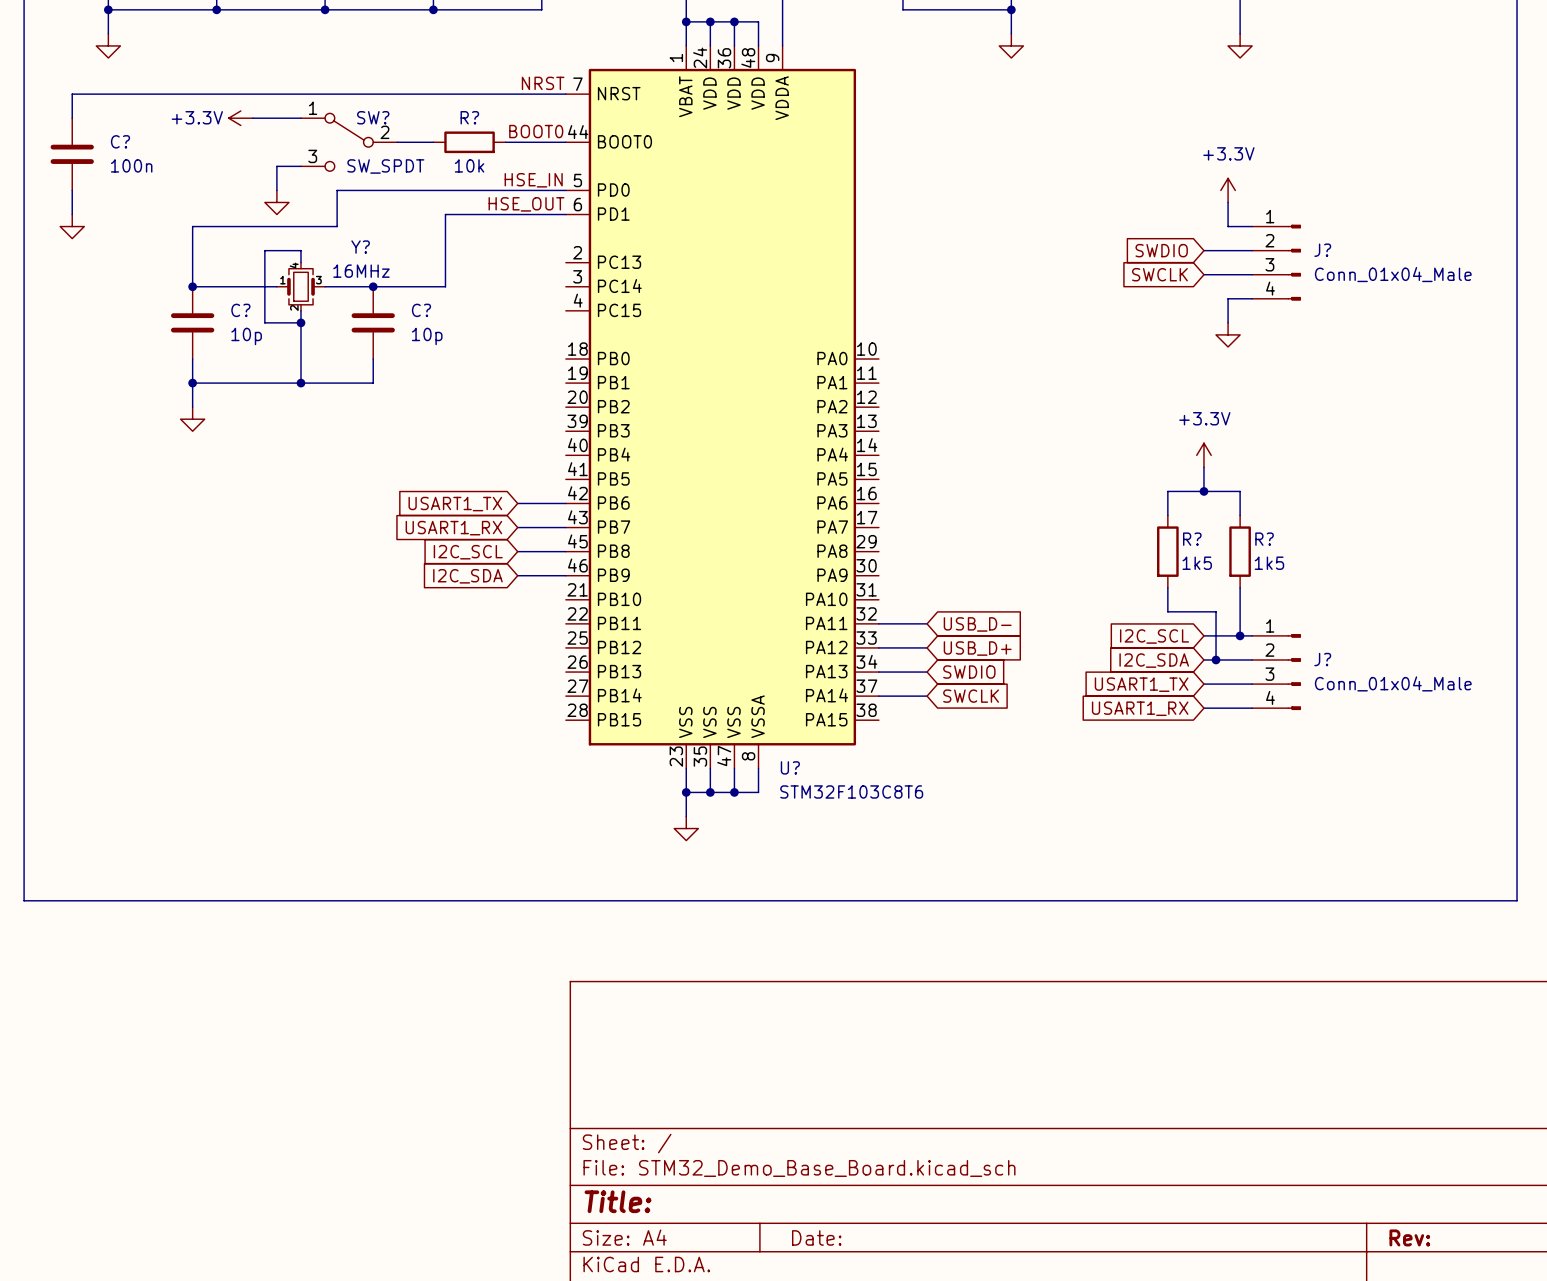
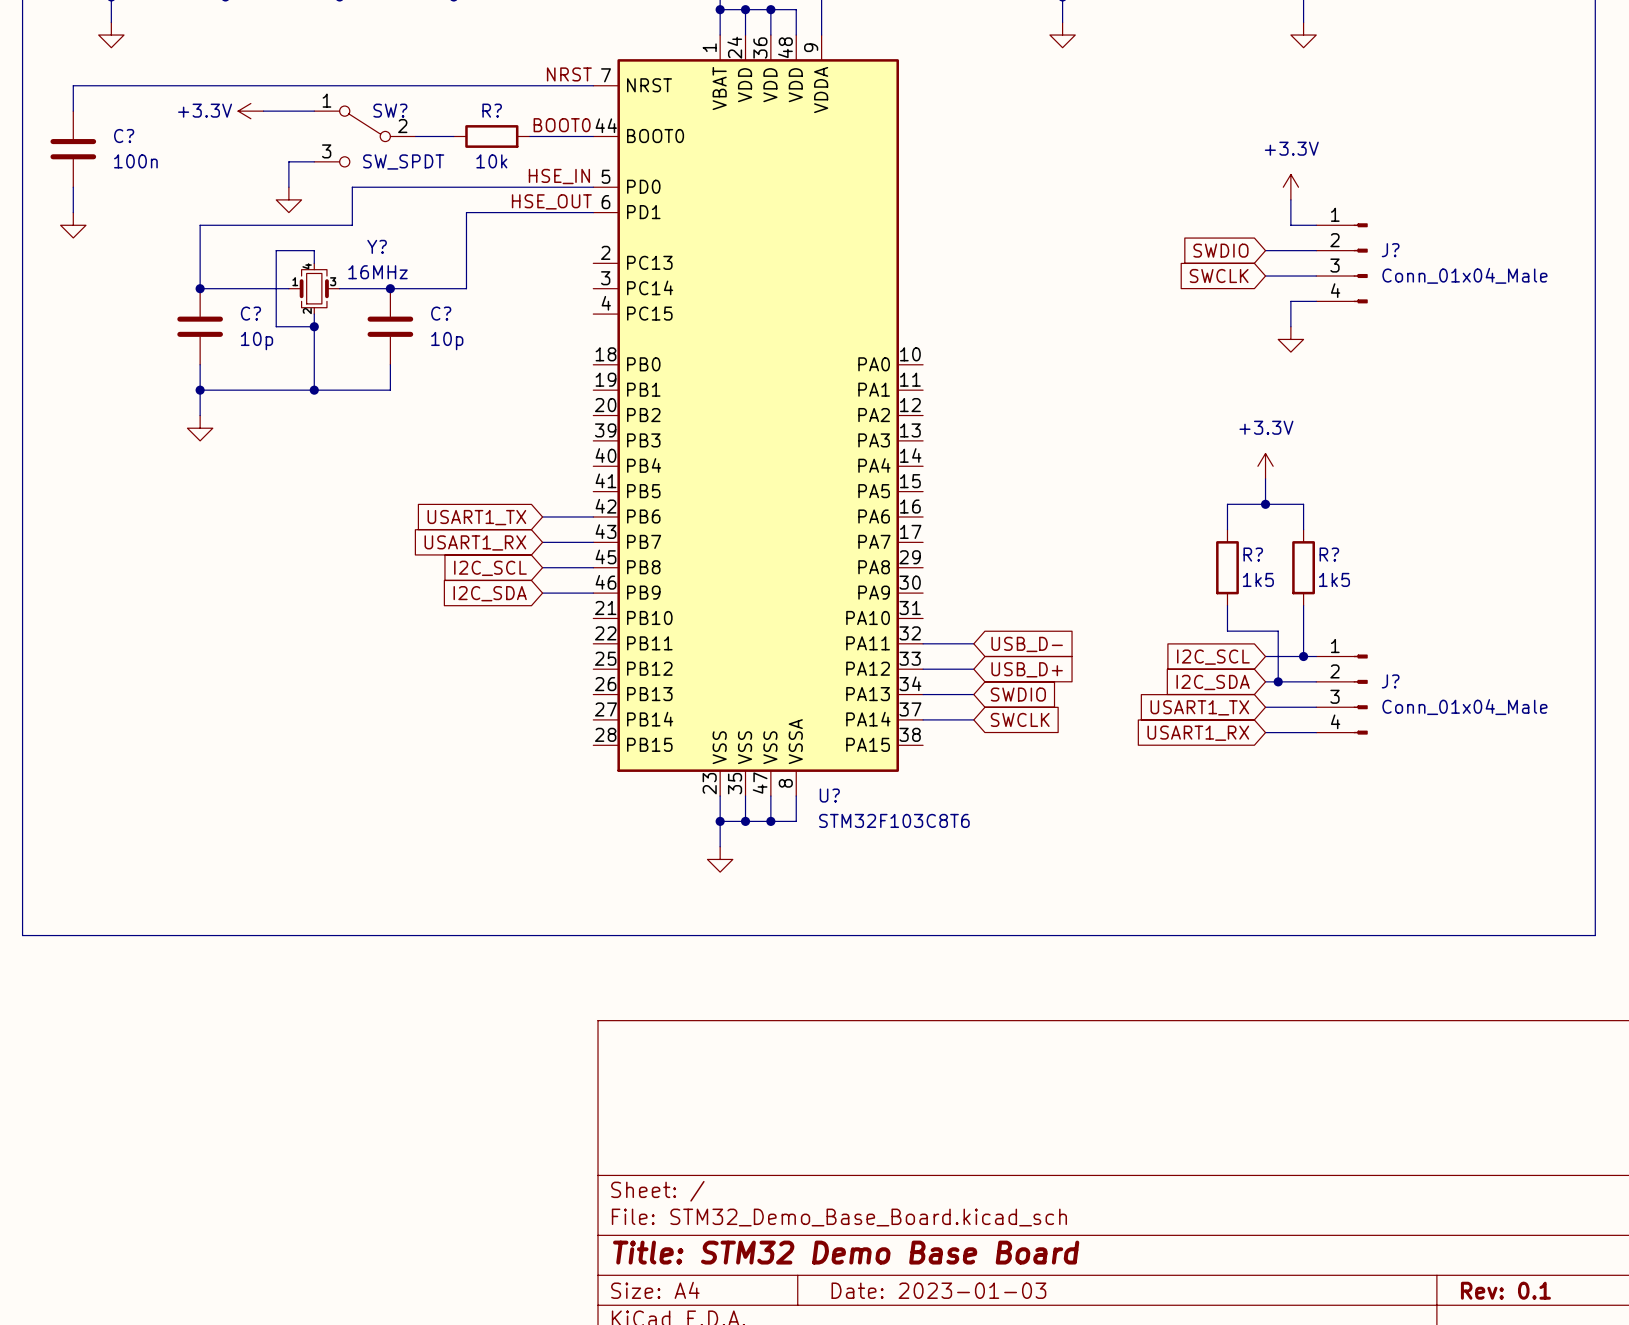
title block: Title: (618, 1201) -> Title: STM32 Demo Base Board (846, 1252)
title block: Date: (816, 1237) -> Date: 2023-01-03 (938, 1290)
title block: Rev: (1409, 1237) -> Rev: 0.1 (1505, 1290)

